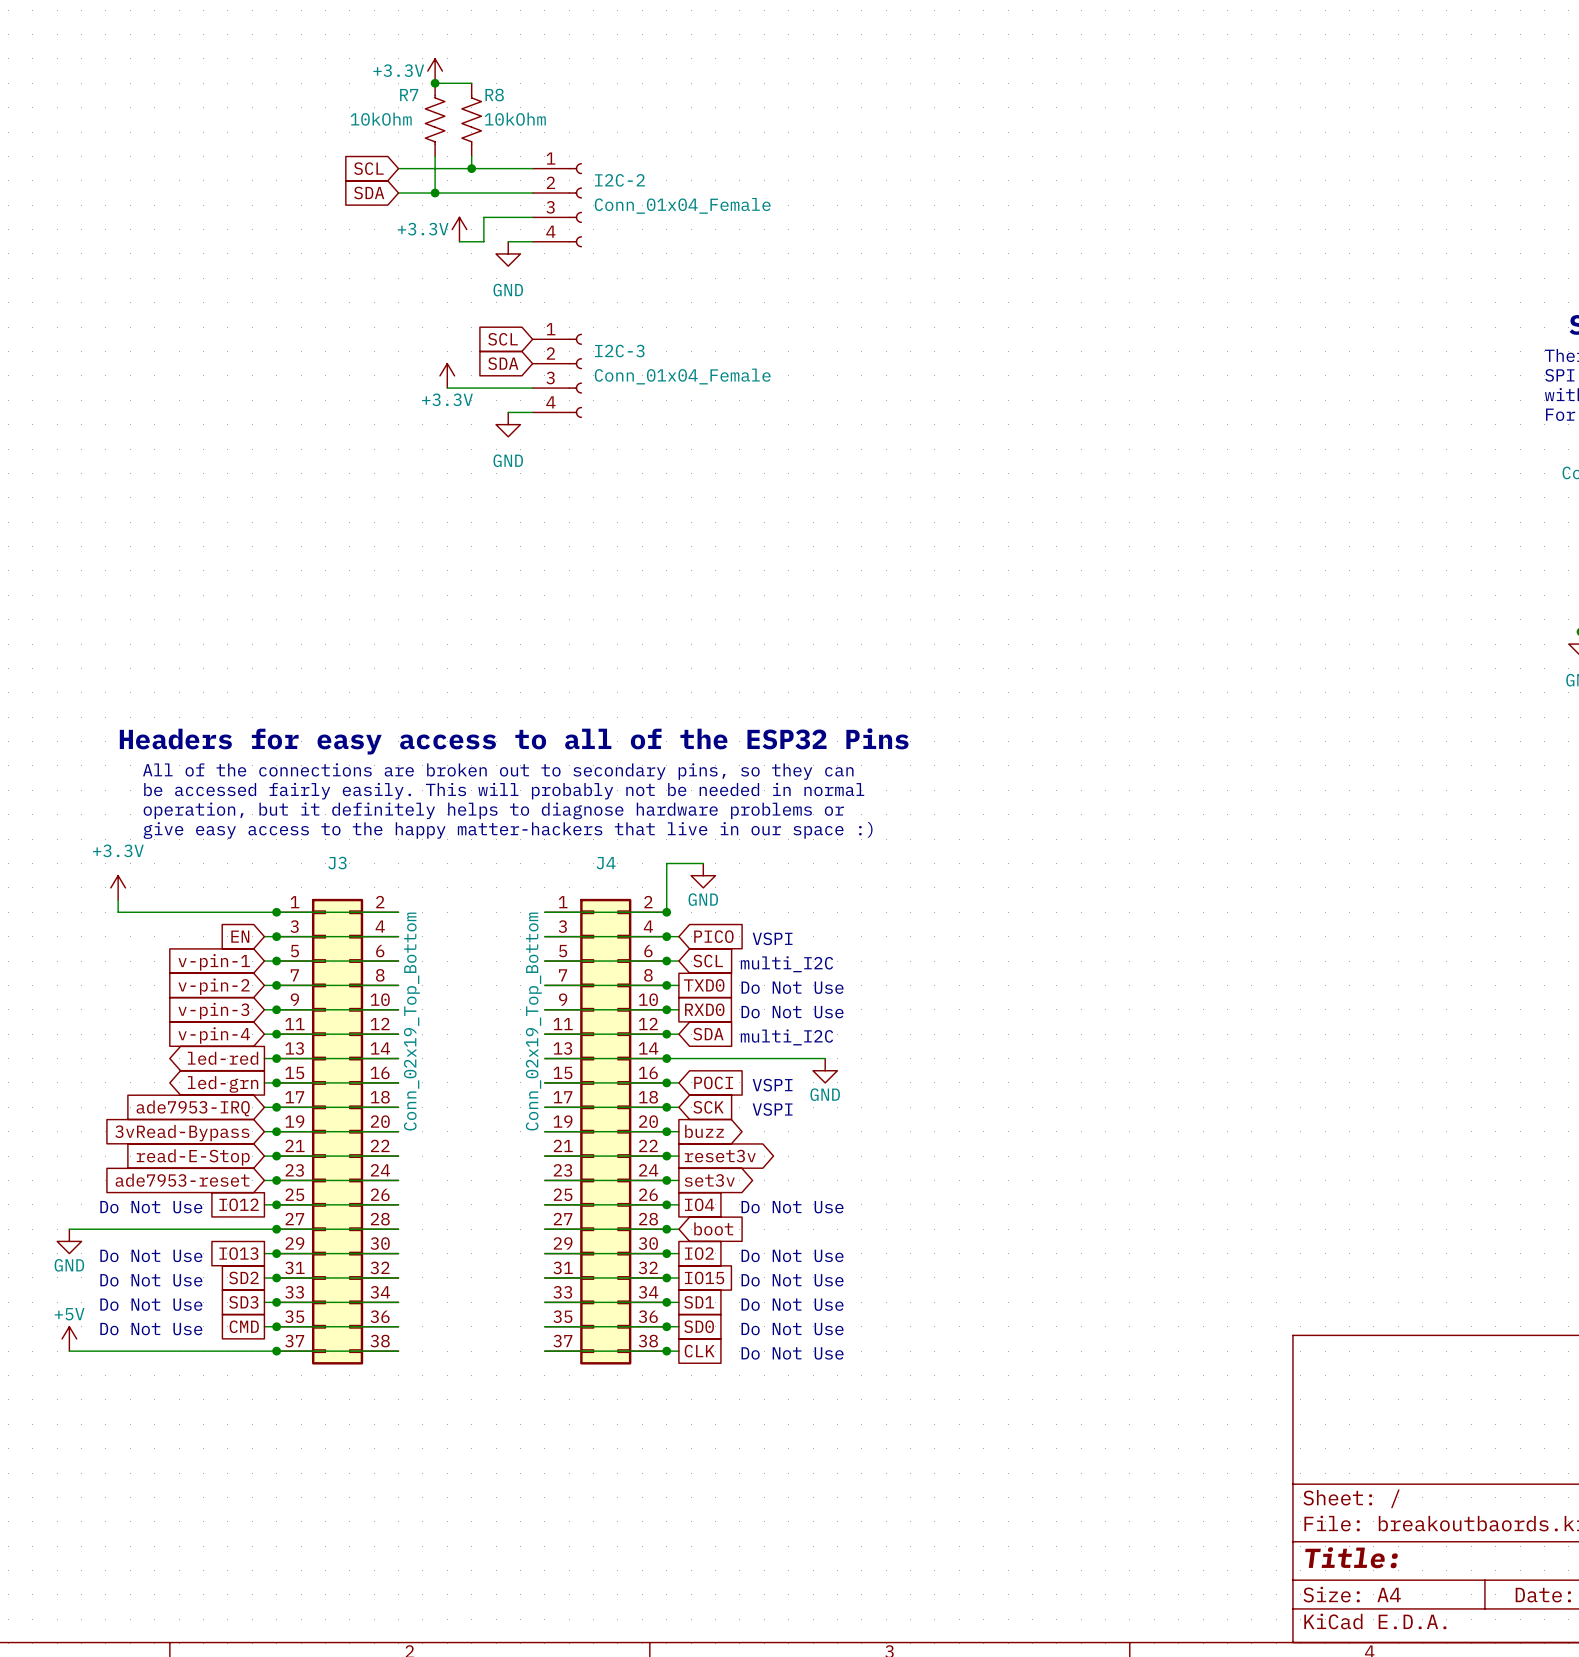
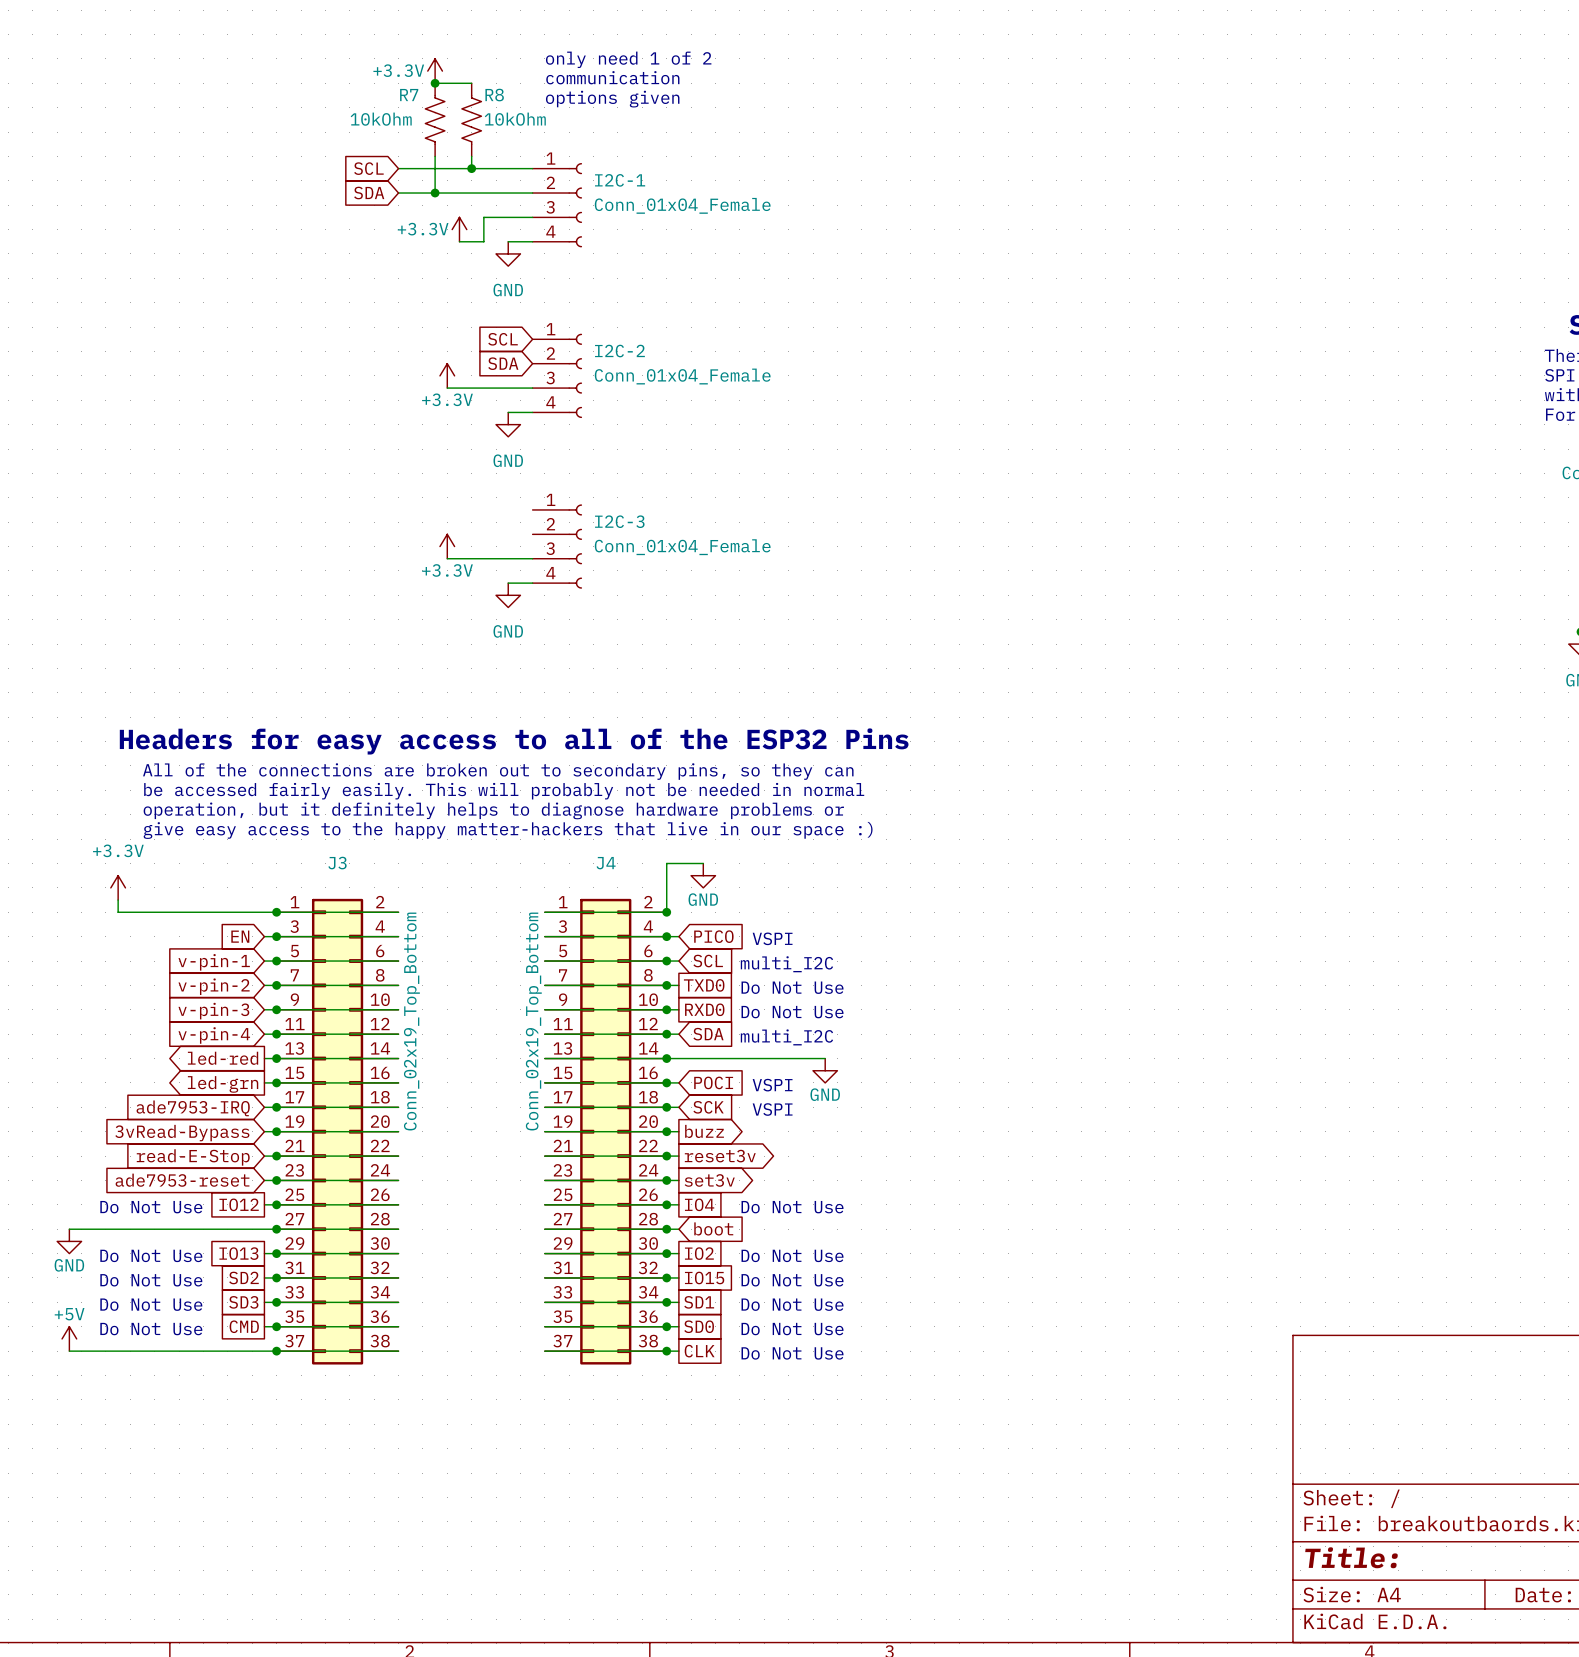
text: none -> only need 1 of 2 (628, 59)
text: none -> communication (612, 77)
text: none -> options given (612, 99)
I2C-2 name: I2C-2 (619, 180) -> I2C-1 (620, 180)
I2C-3 name: I2C-3 (619, 351) -> I2C-2 (619, 351)
power symbol: none -> +3.3V (447, 546)
I2C-3: none -> Conn_01x04_Female (557, 546)
wire: none -> (447, 558) (532, 558)
wire: none -> (508, 583) (532, 583)
power symbol: none -> GND (508, 595)

